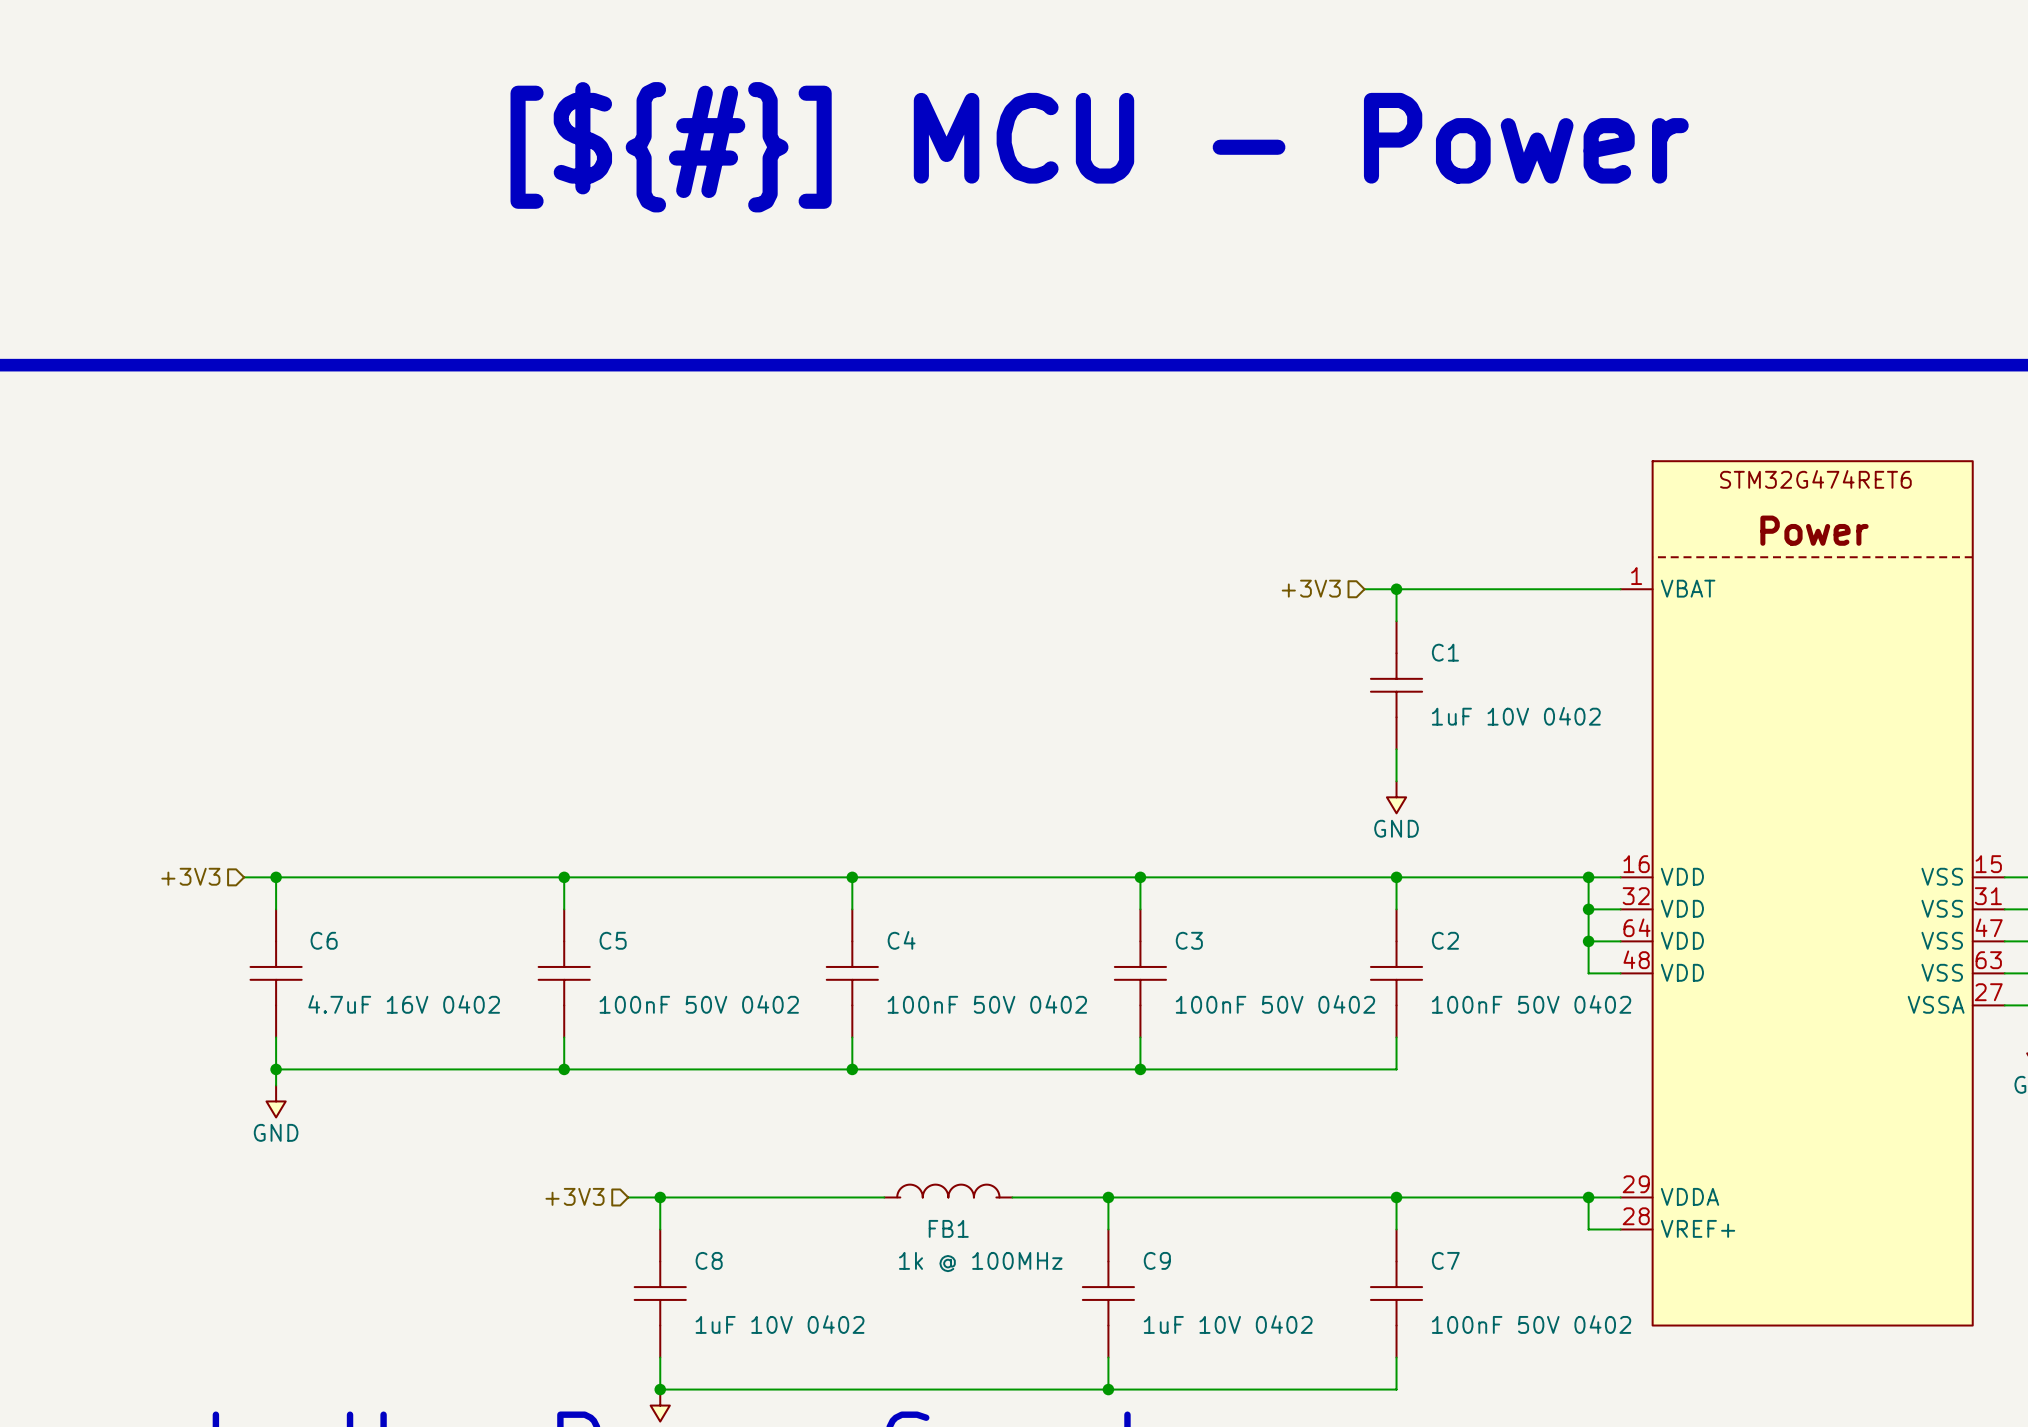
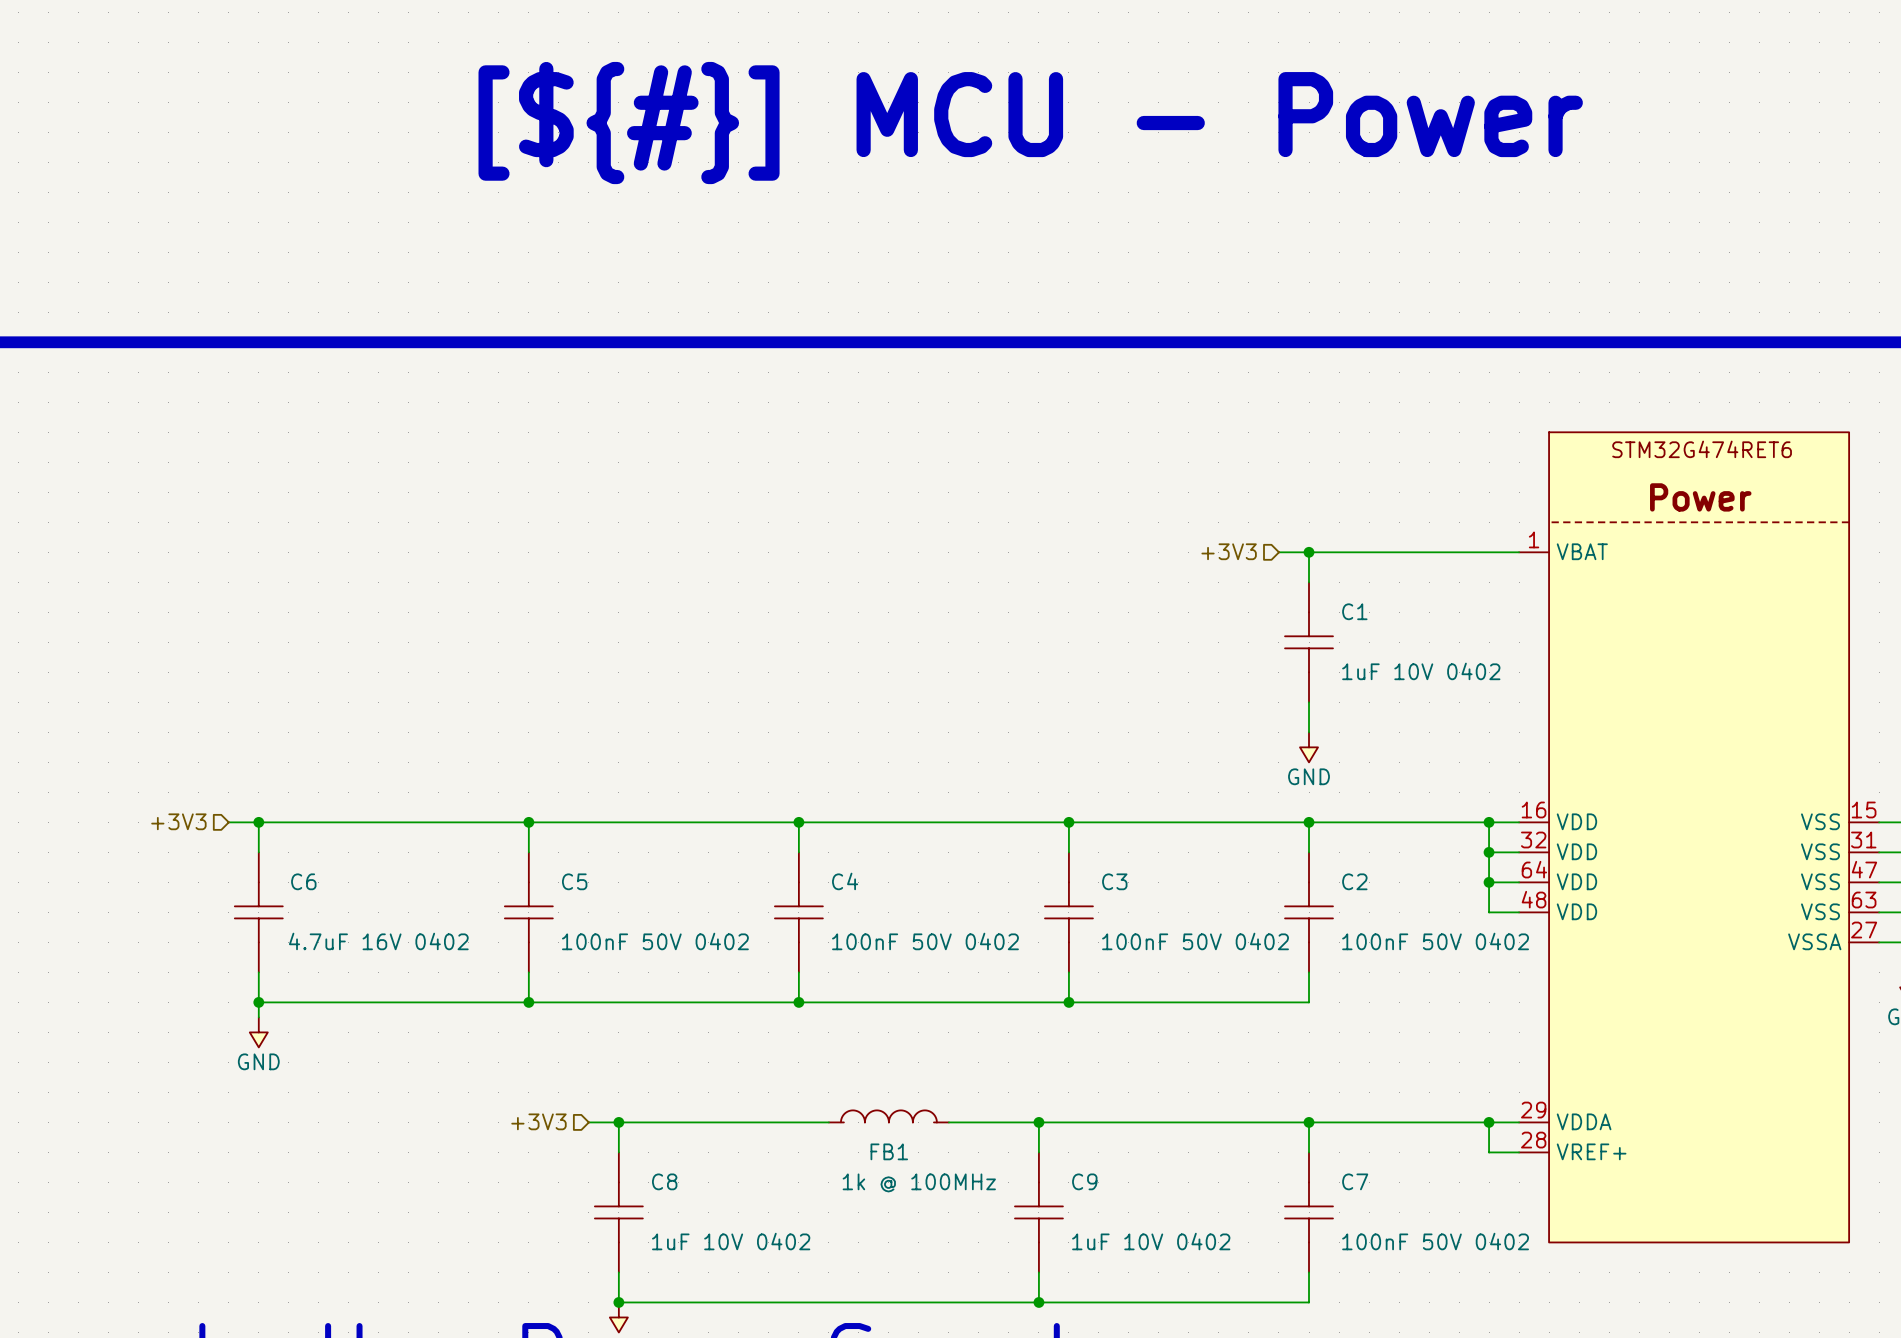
text position: [${#}] MCU - Power (1099, 147) -> [${#}] MCU - Power (1030, 123)

